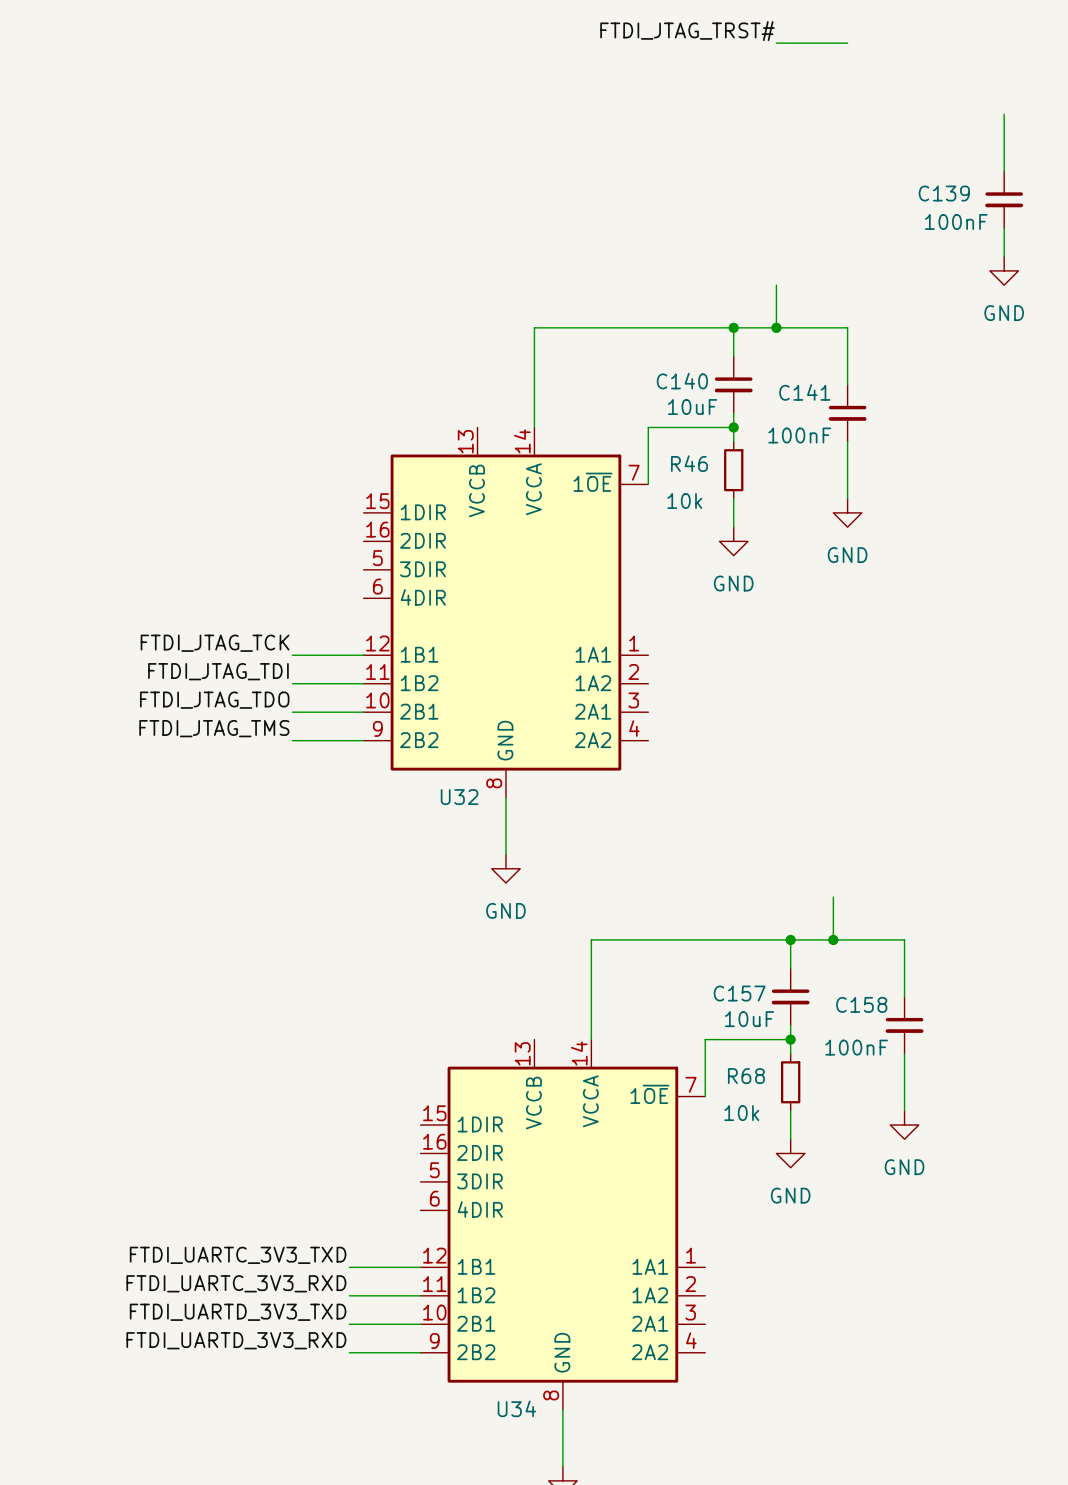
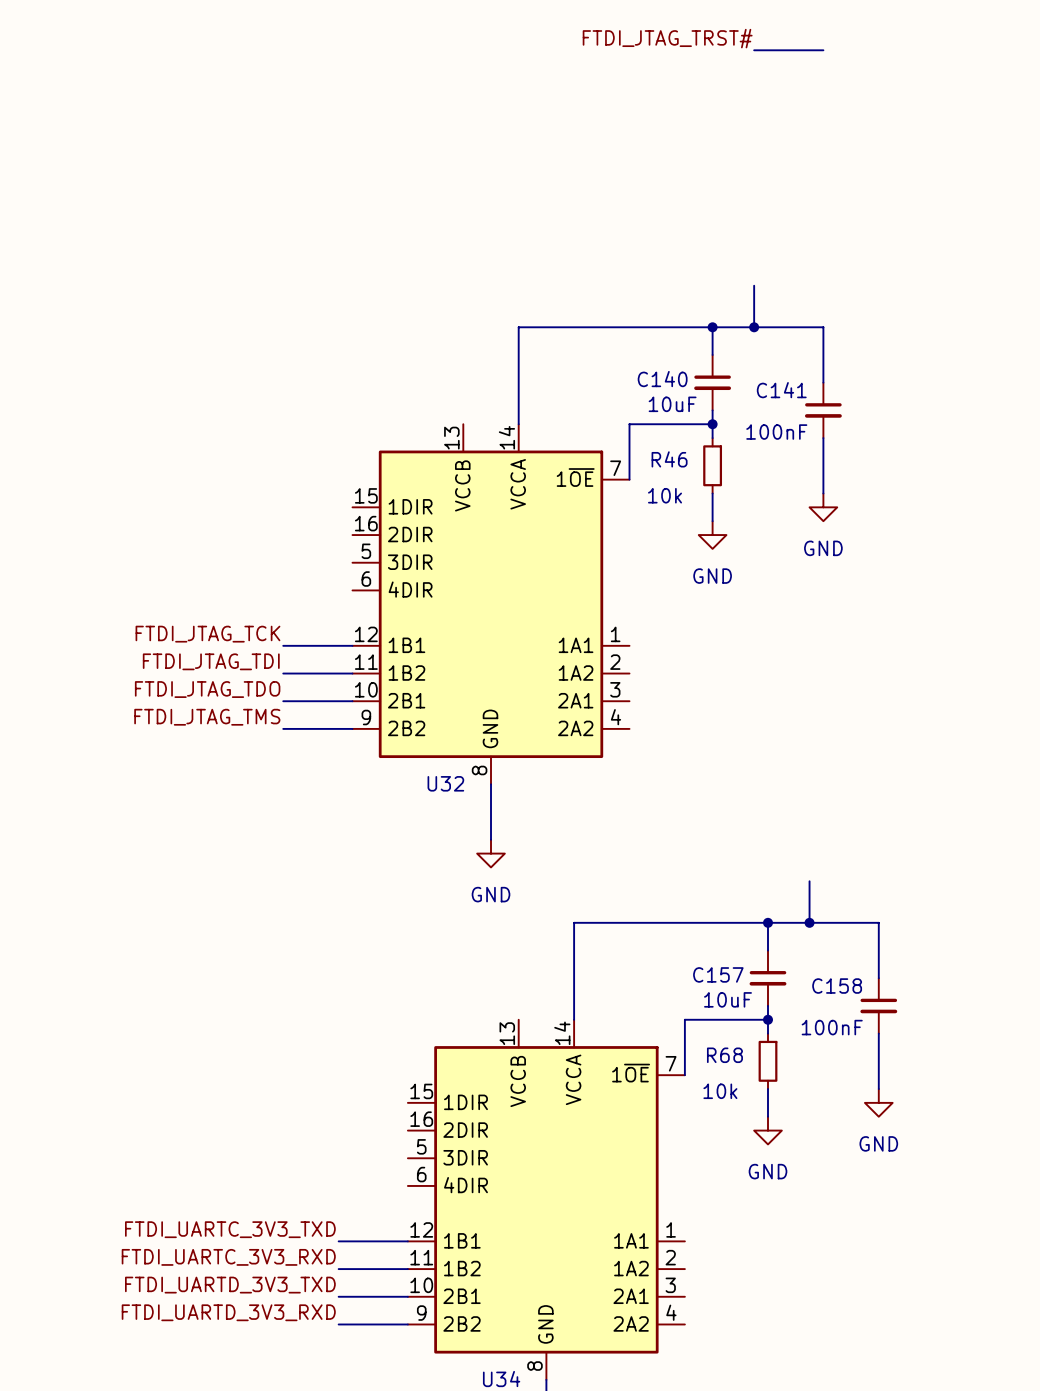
wire: (1004, 114) (1004, 171) -> none
C139: 100nF (1004, 199) -> none
wire: (1004, 228) (1004, 256) -> none
power symbol: GND (1004, 270) -> none

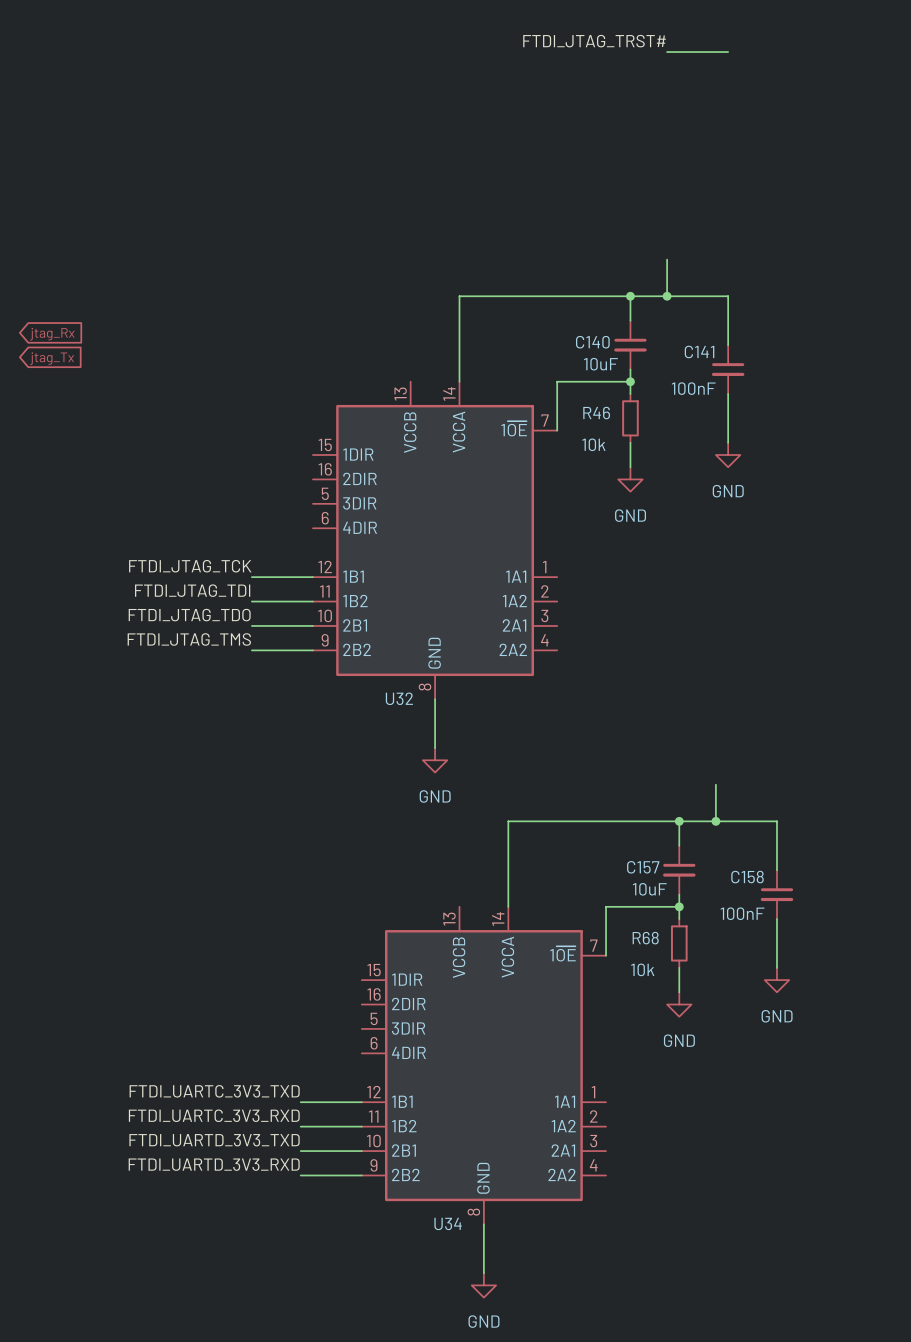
global label: none -> jtag_Rx (52, 334)
global label: none -> jtag_Tx (52, 358)

